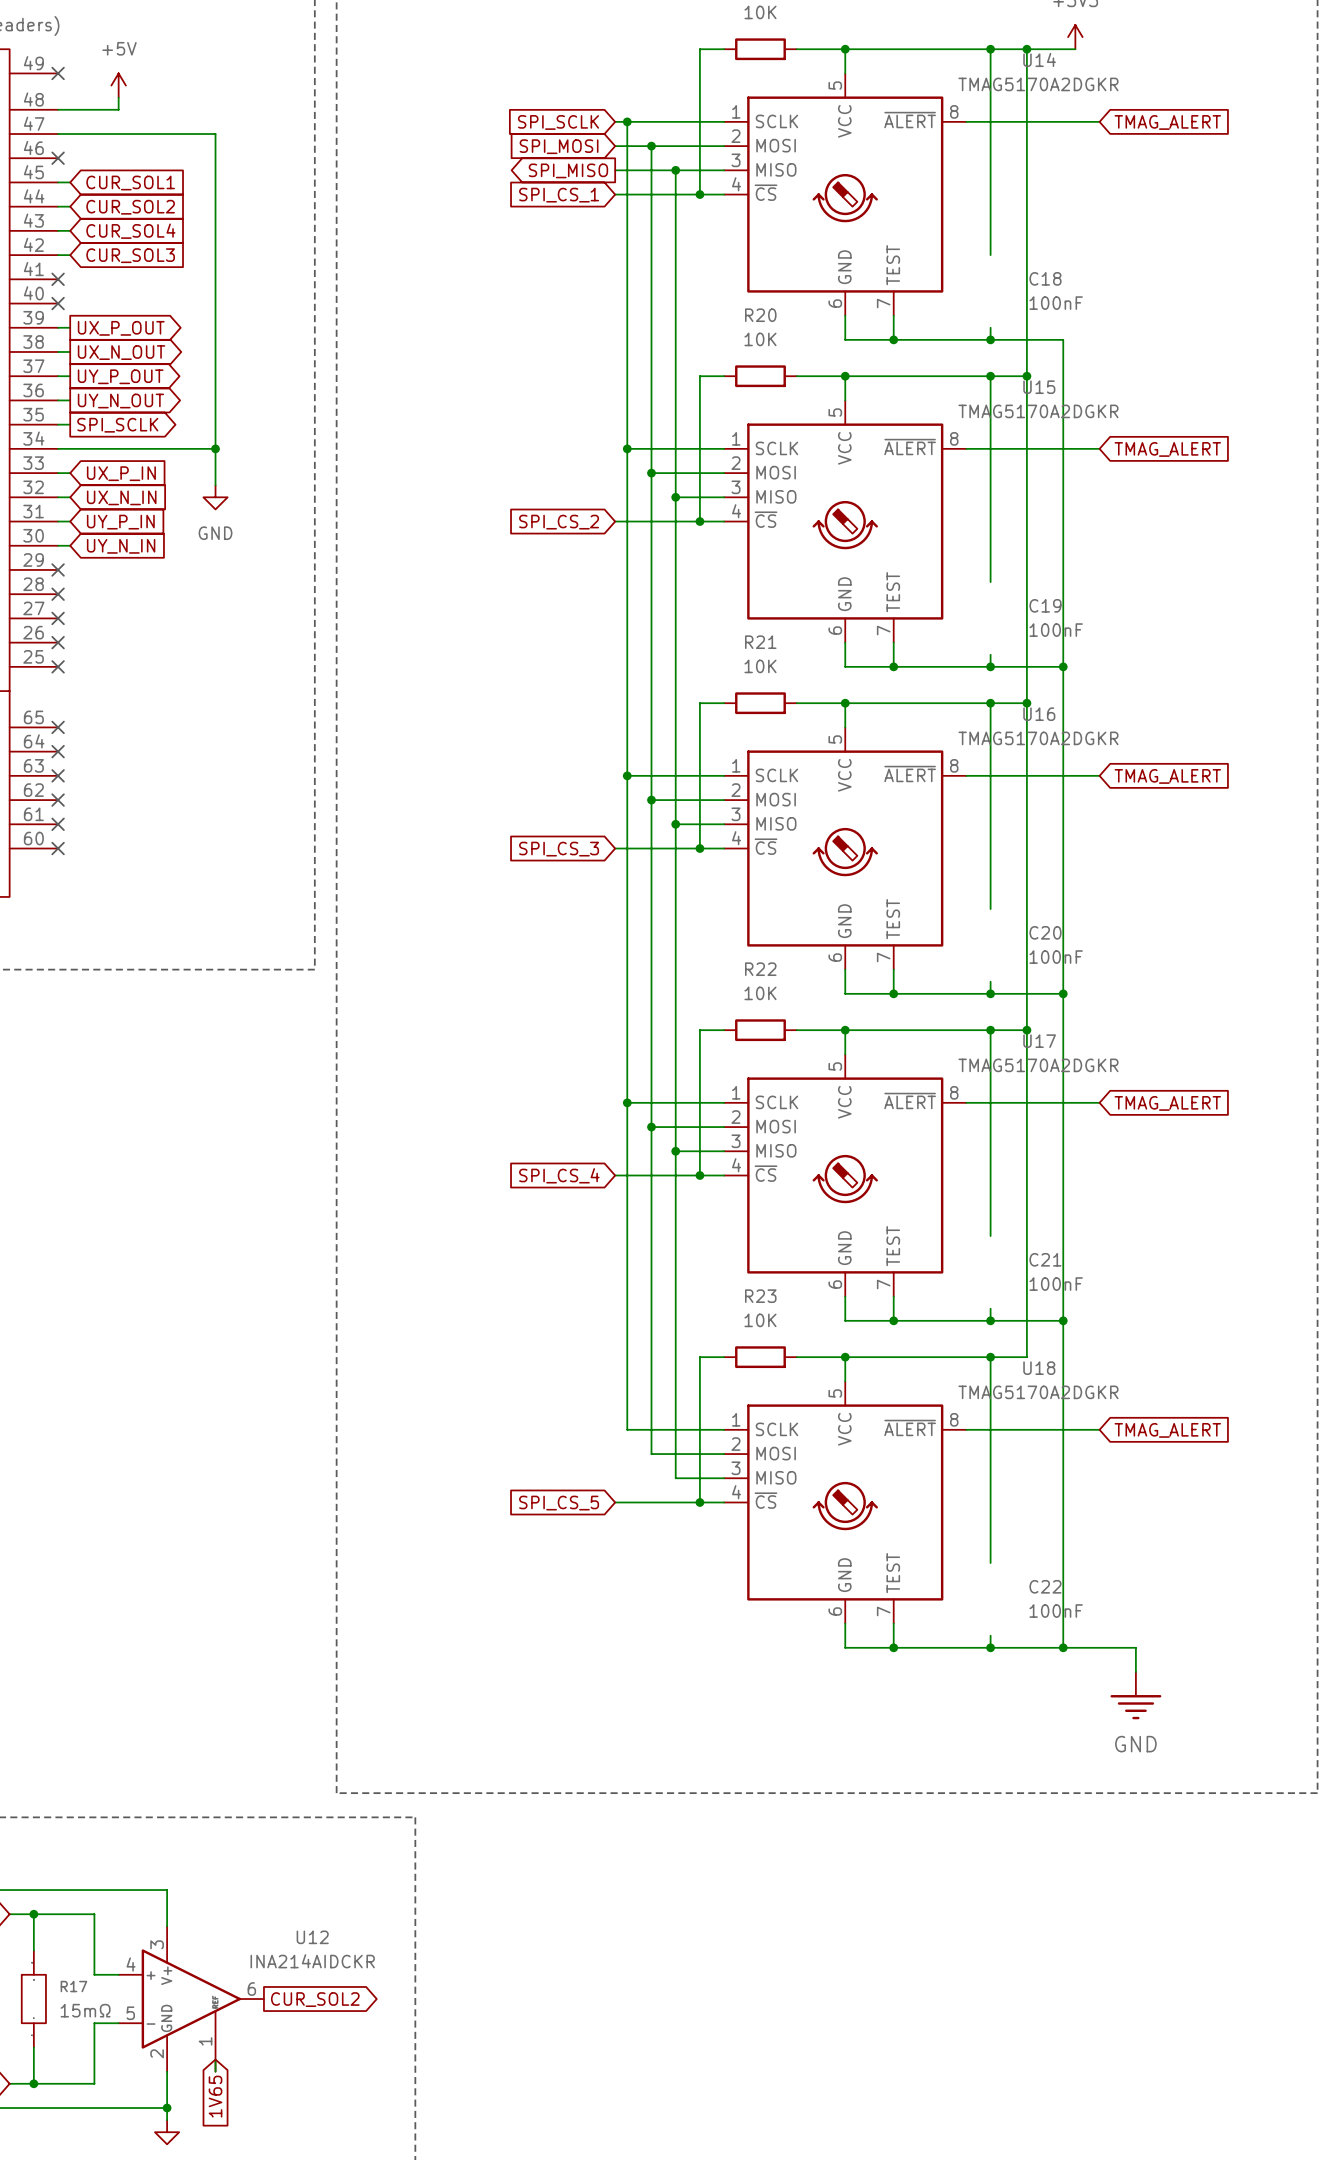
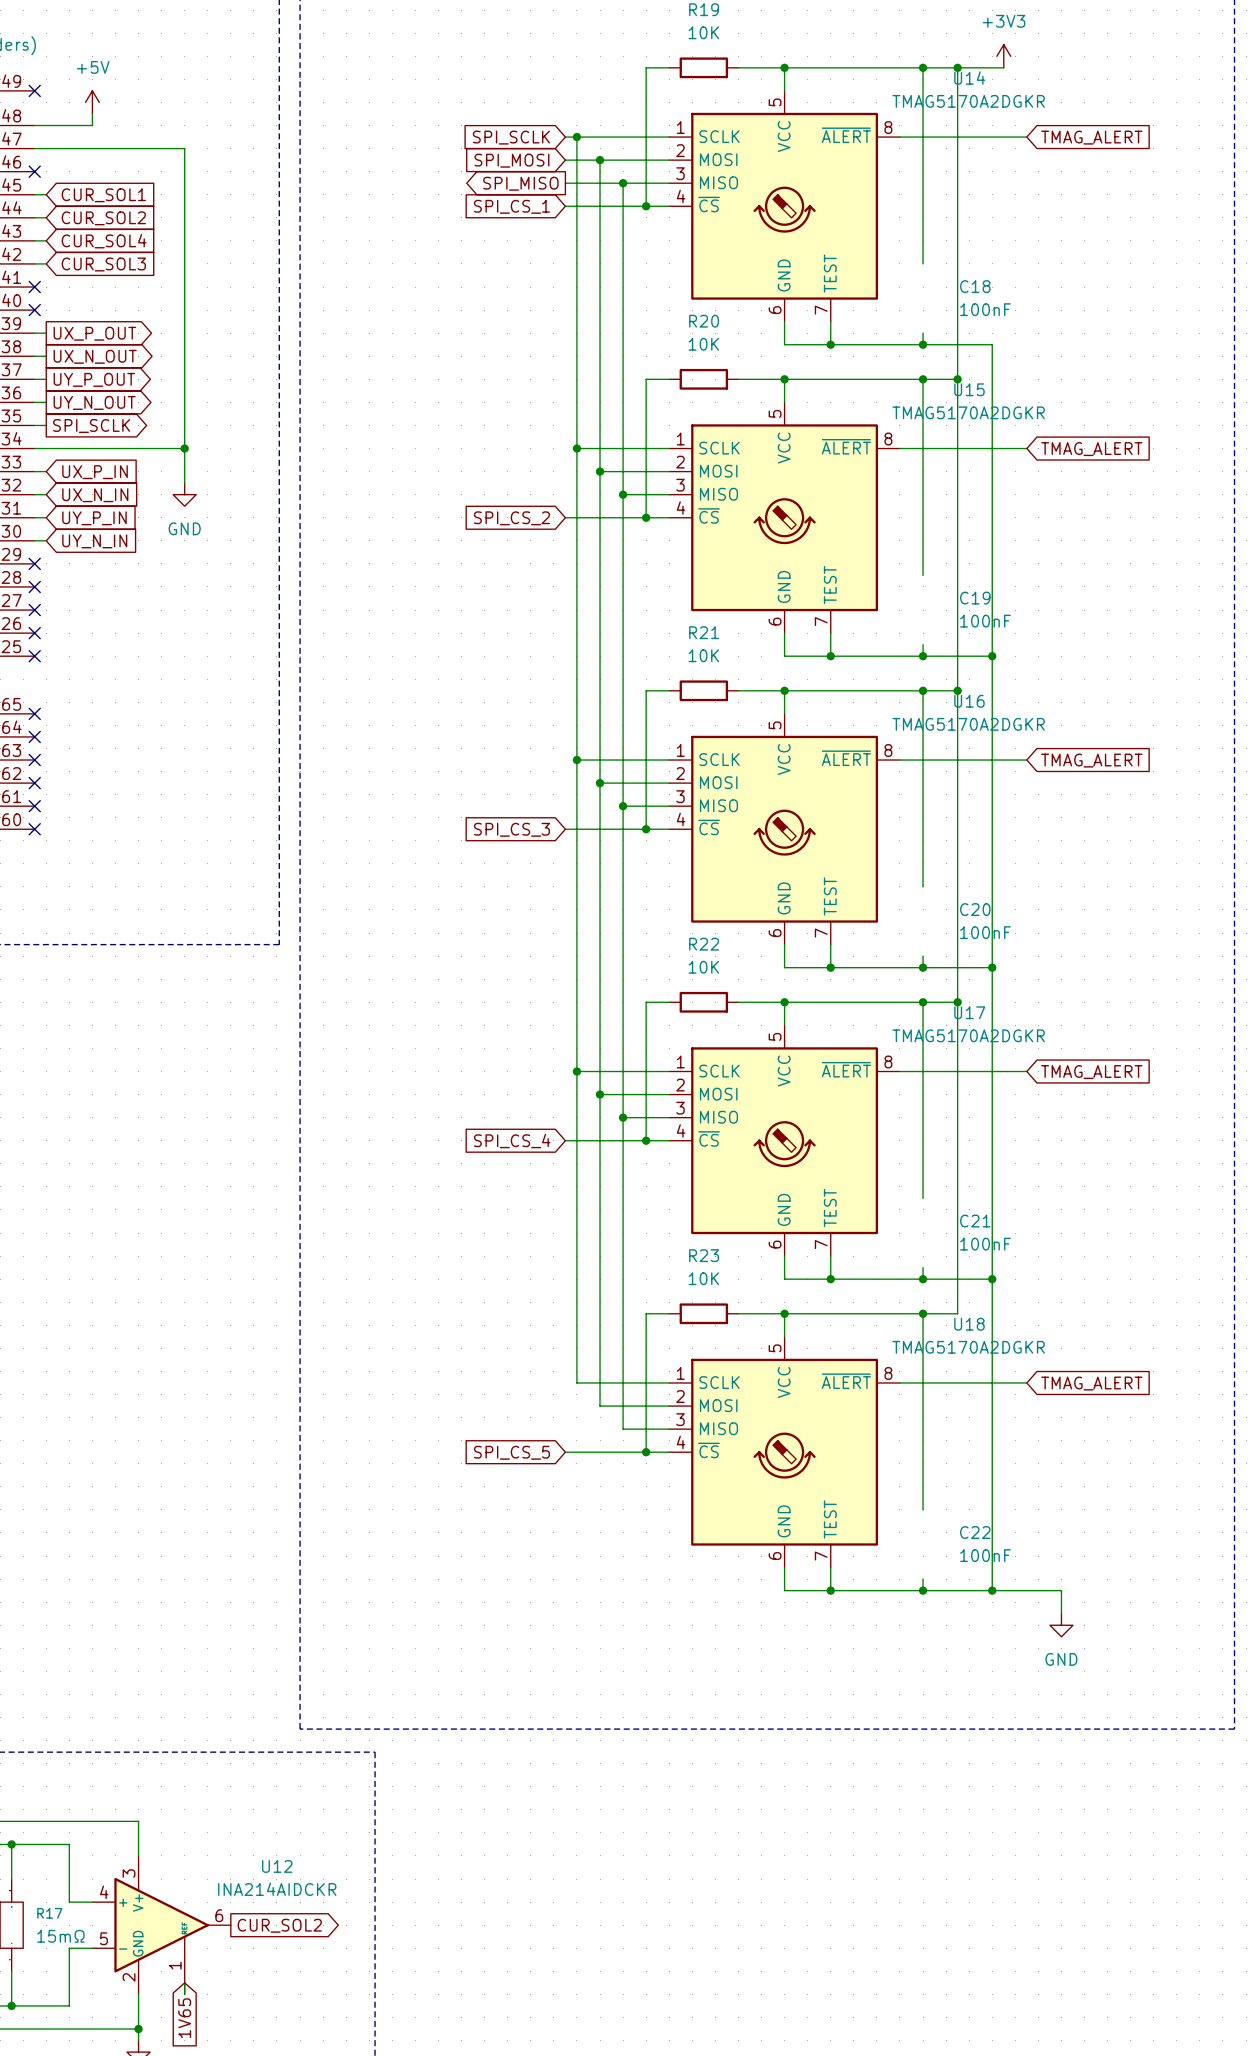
power symbol: none -> GND (1061, 1625)
power symbol: GND (1135, 1695) -> none

